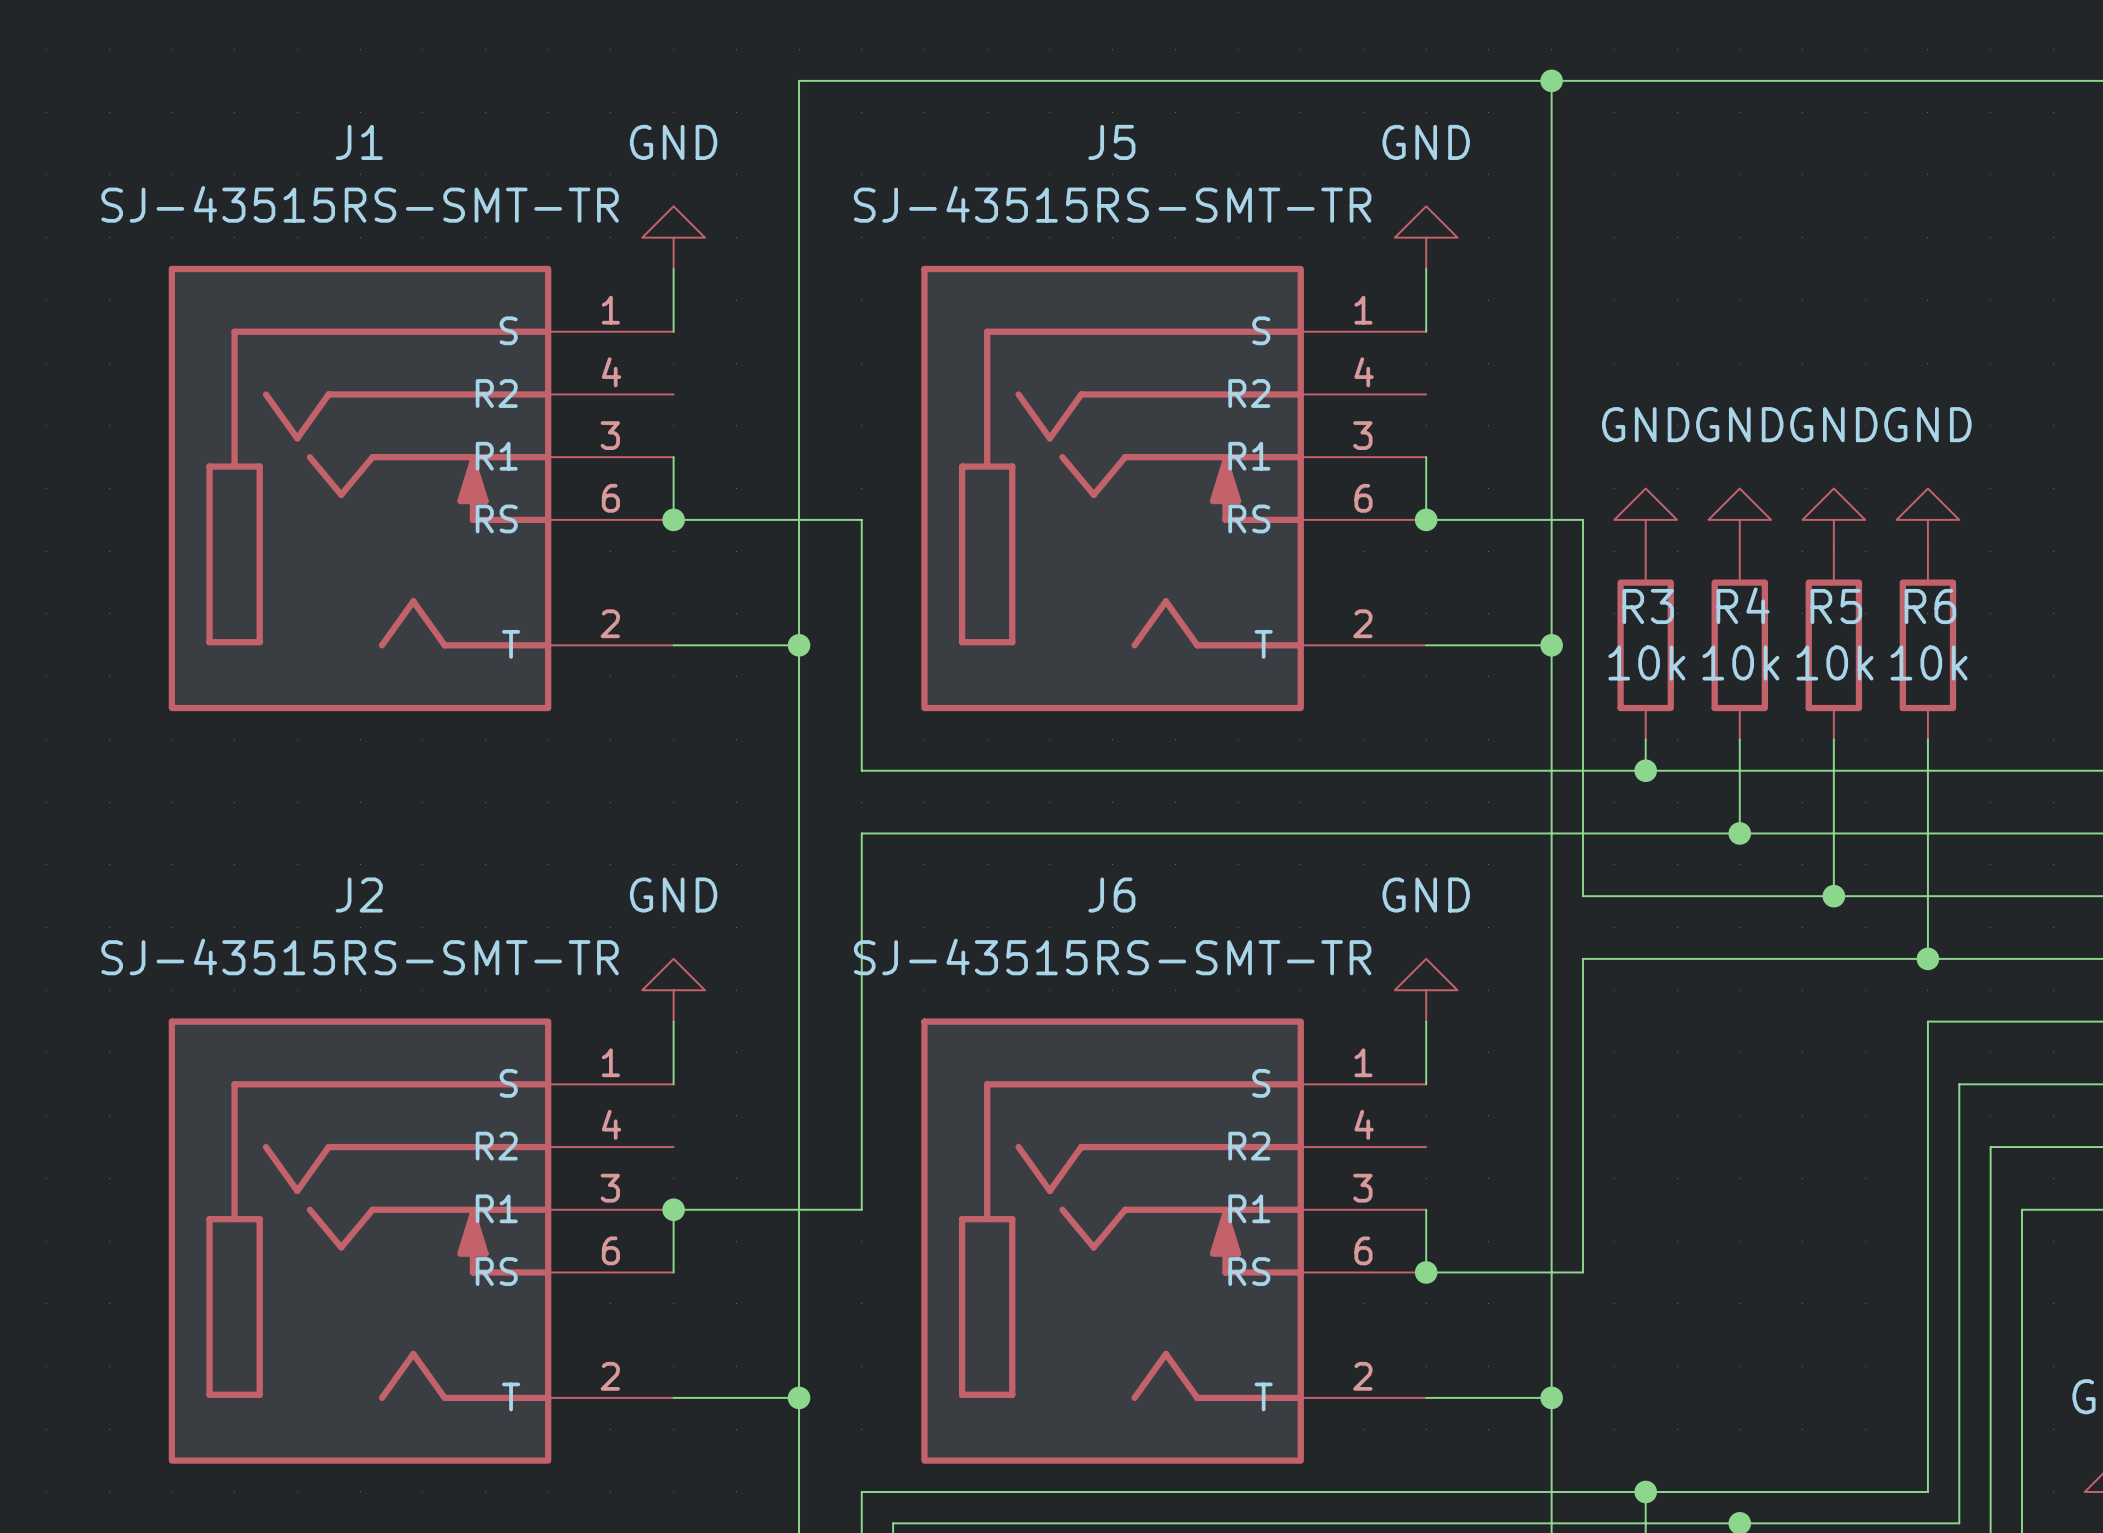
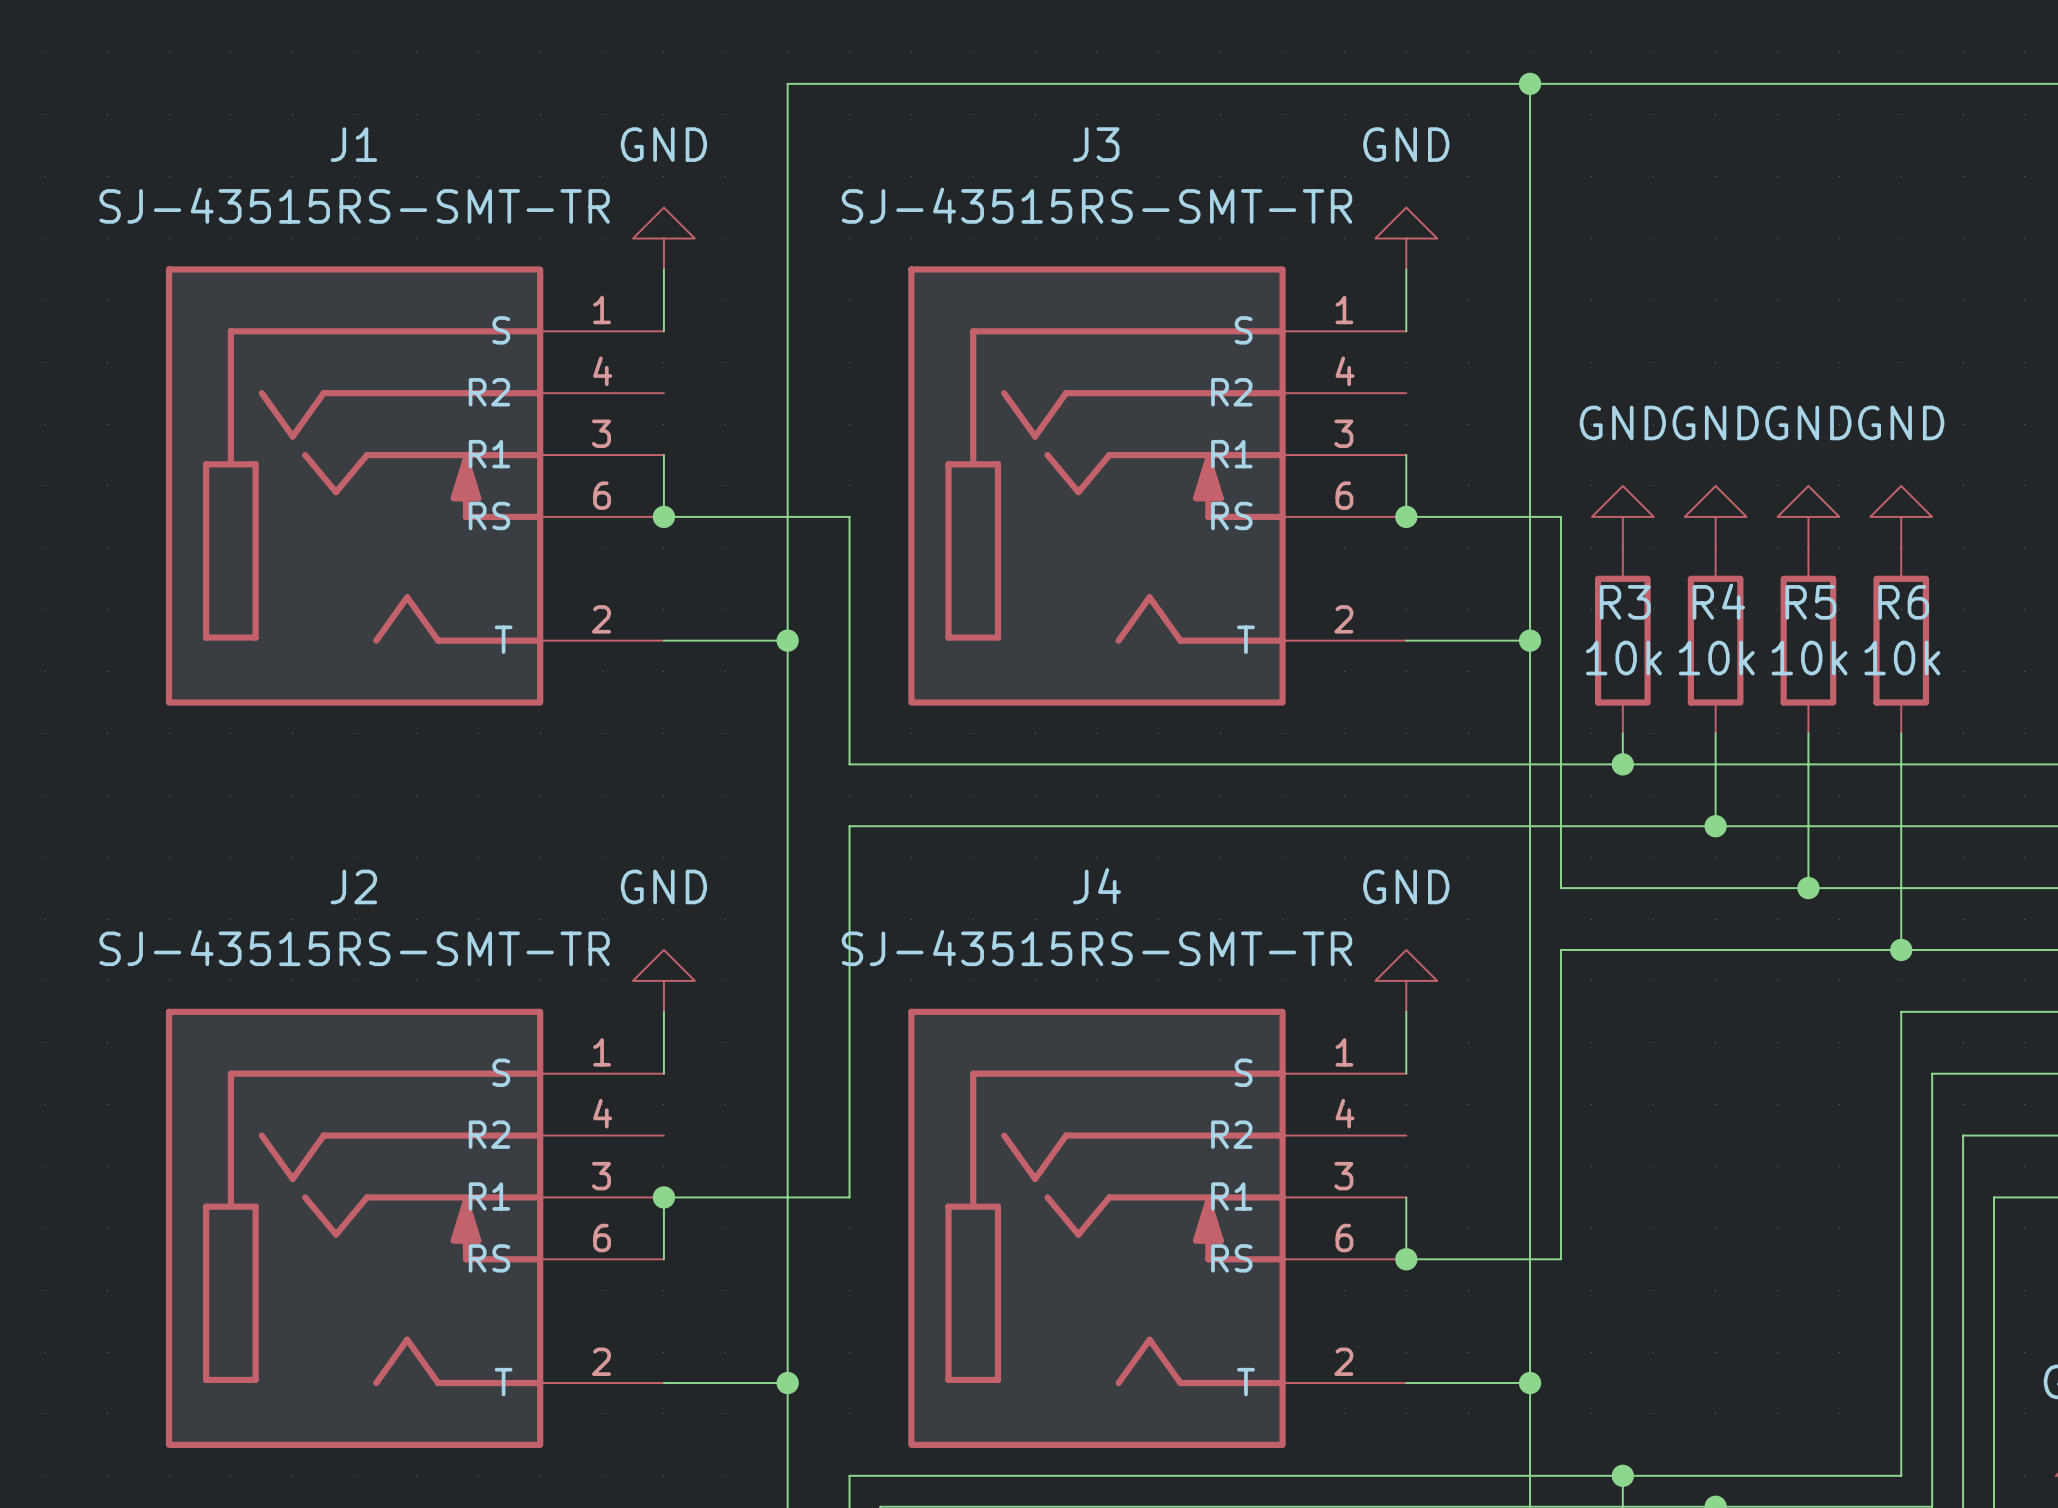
J5 name: J5 (1111, 142) -> J3 (1096, 144)
J6 name: J6 (1111, 895) -> J4 (1096, 886)

